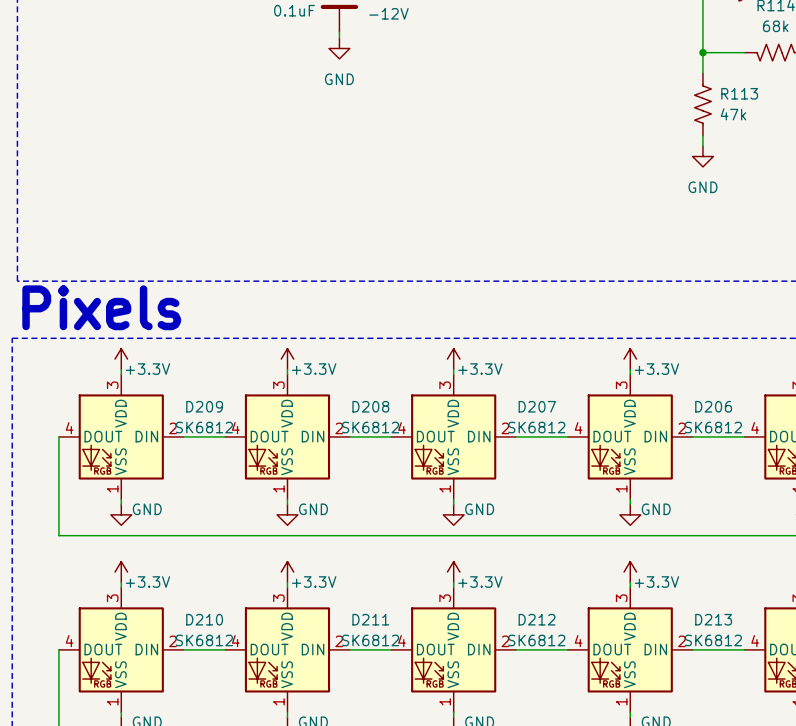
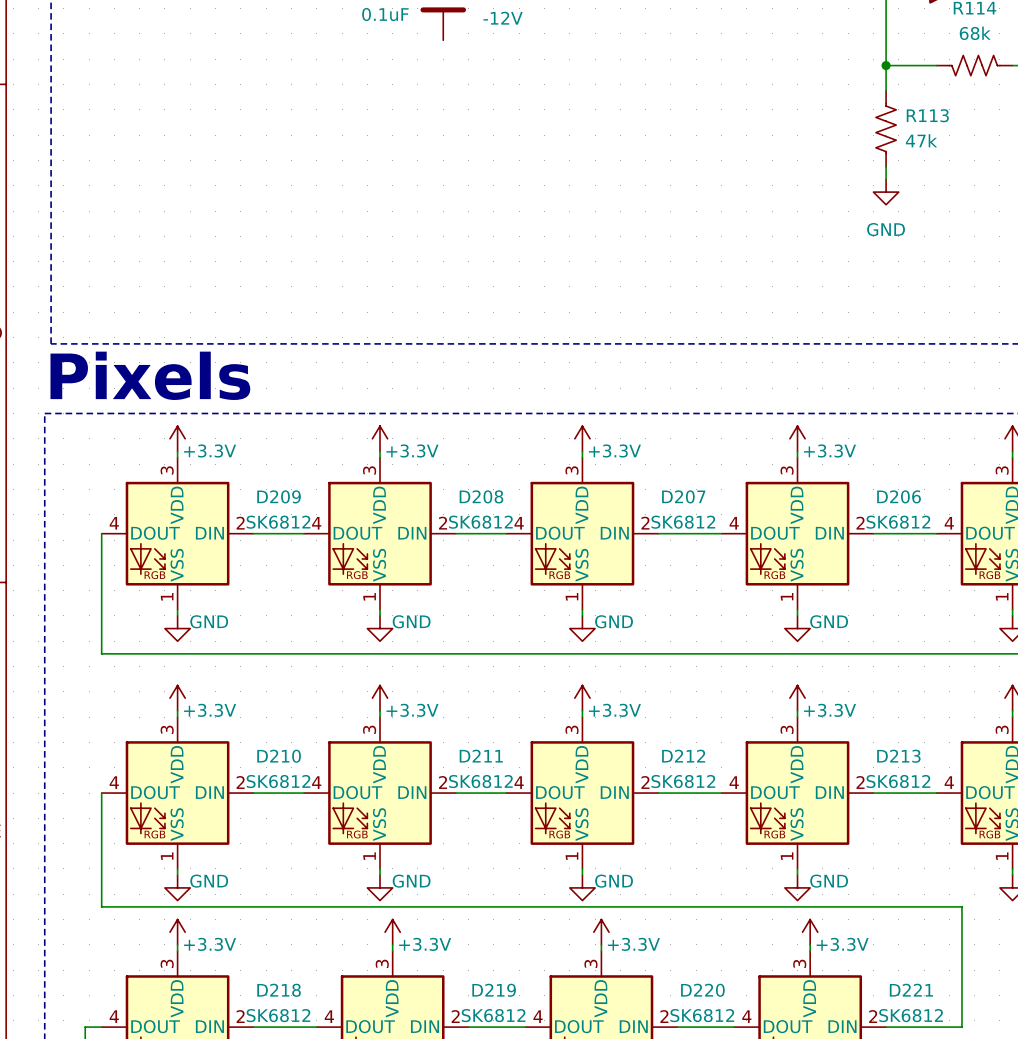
wire: (339, 31) (339, 38) -> none
power symbol: GND (339, 48) -> none

